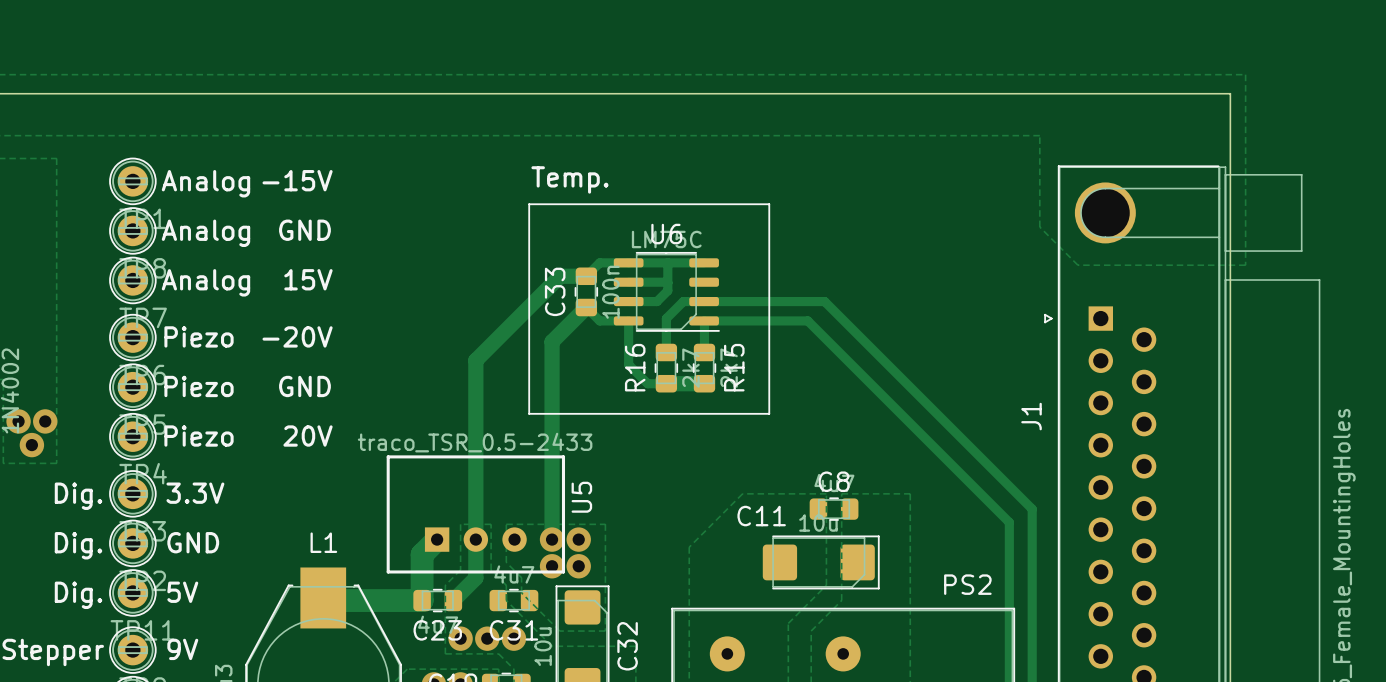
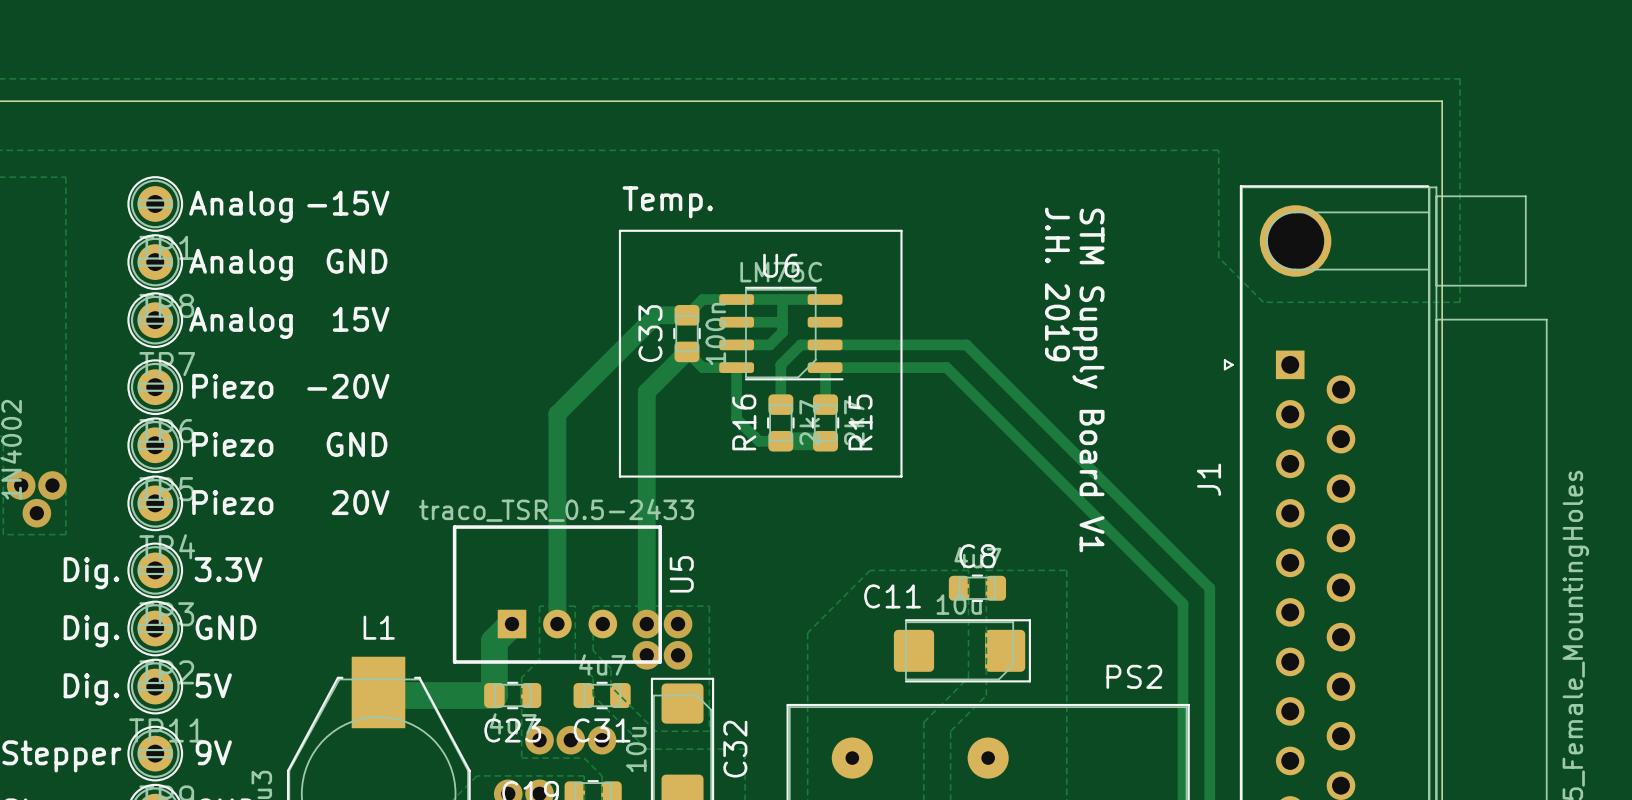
text: none -> J.H. 2019 (1057, 284)
text: none -> STM Supply Board V1 (1088, 380)
track: (475, 539) (475, 578) (453, 600) -> none

